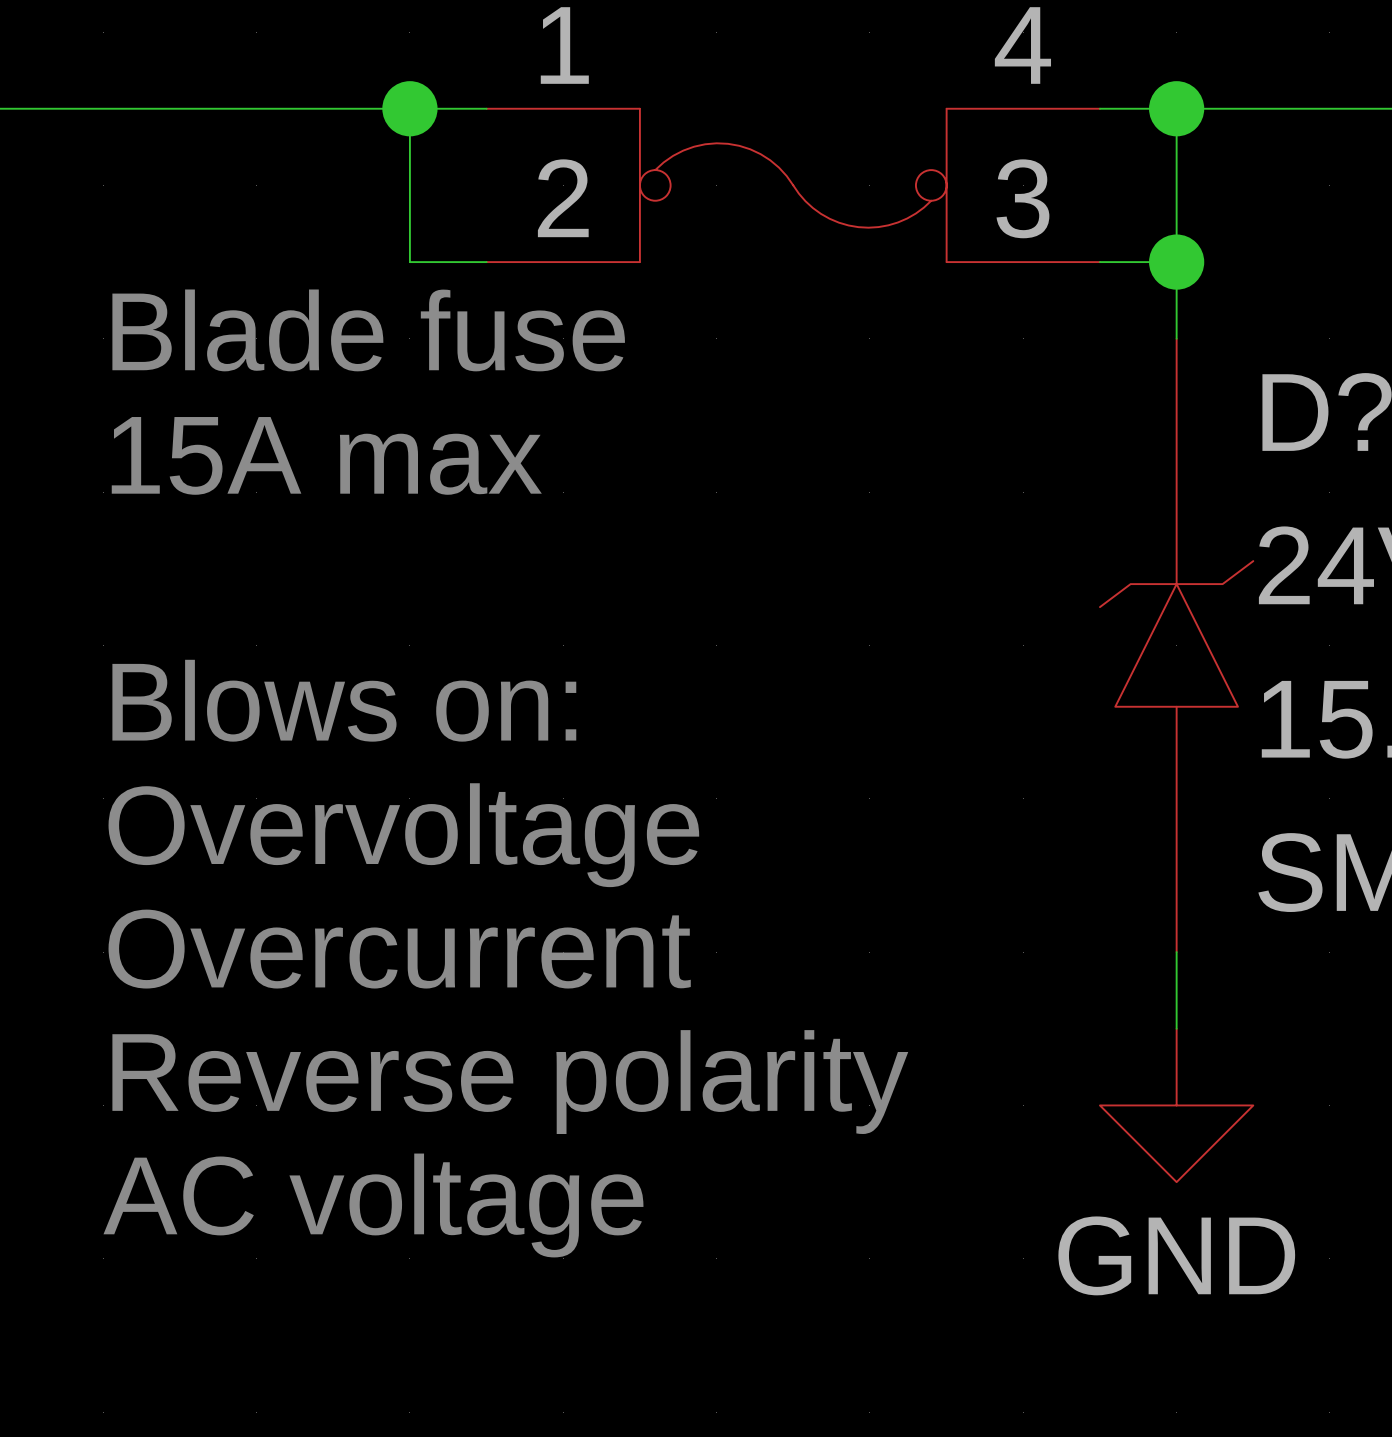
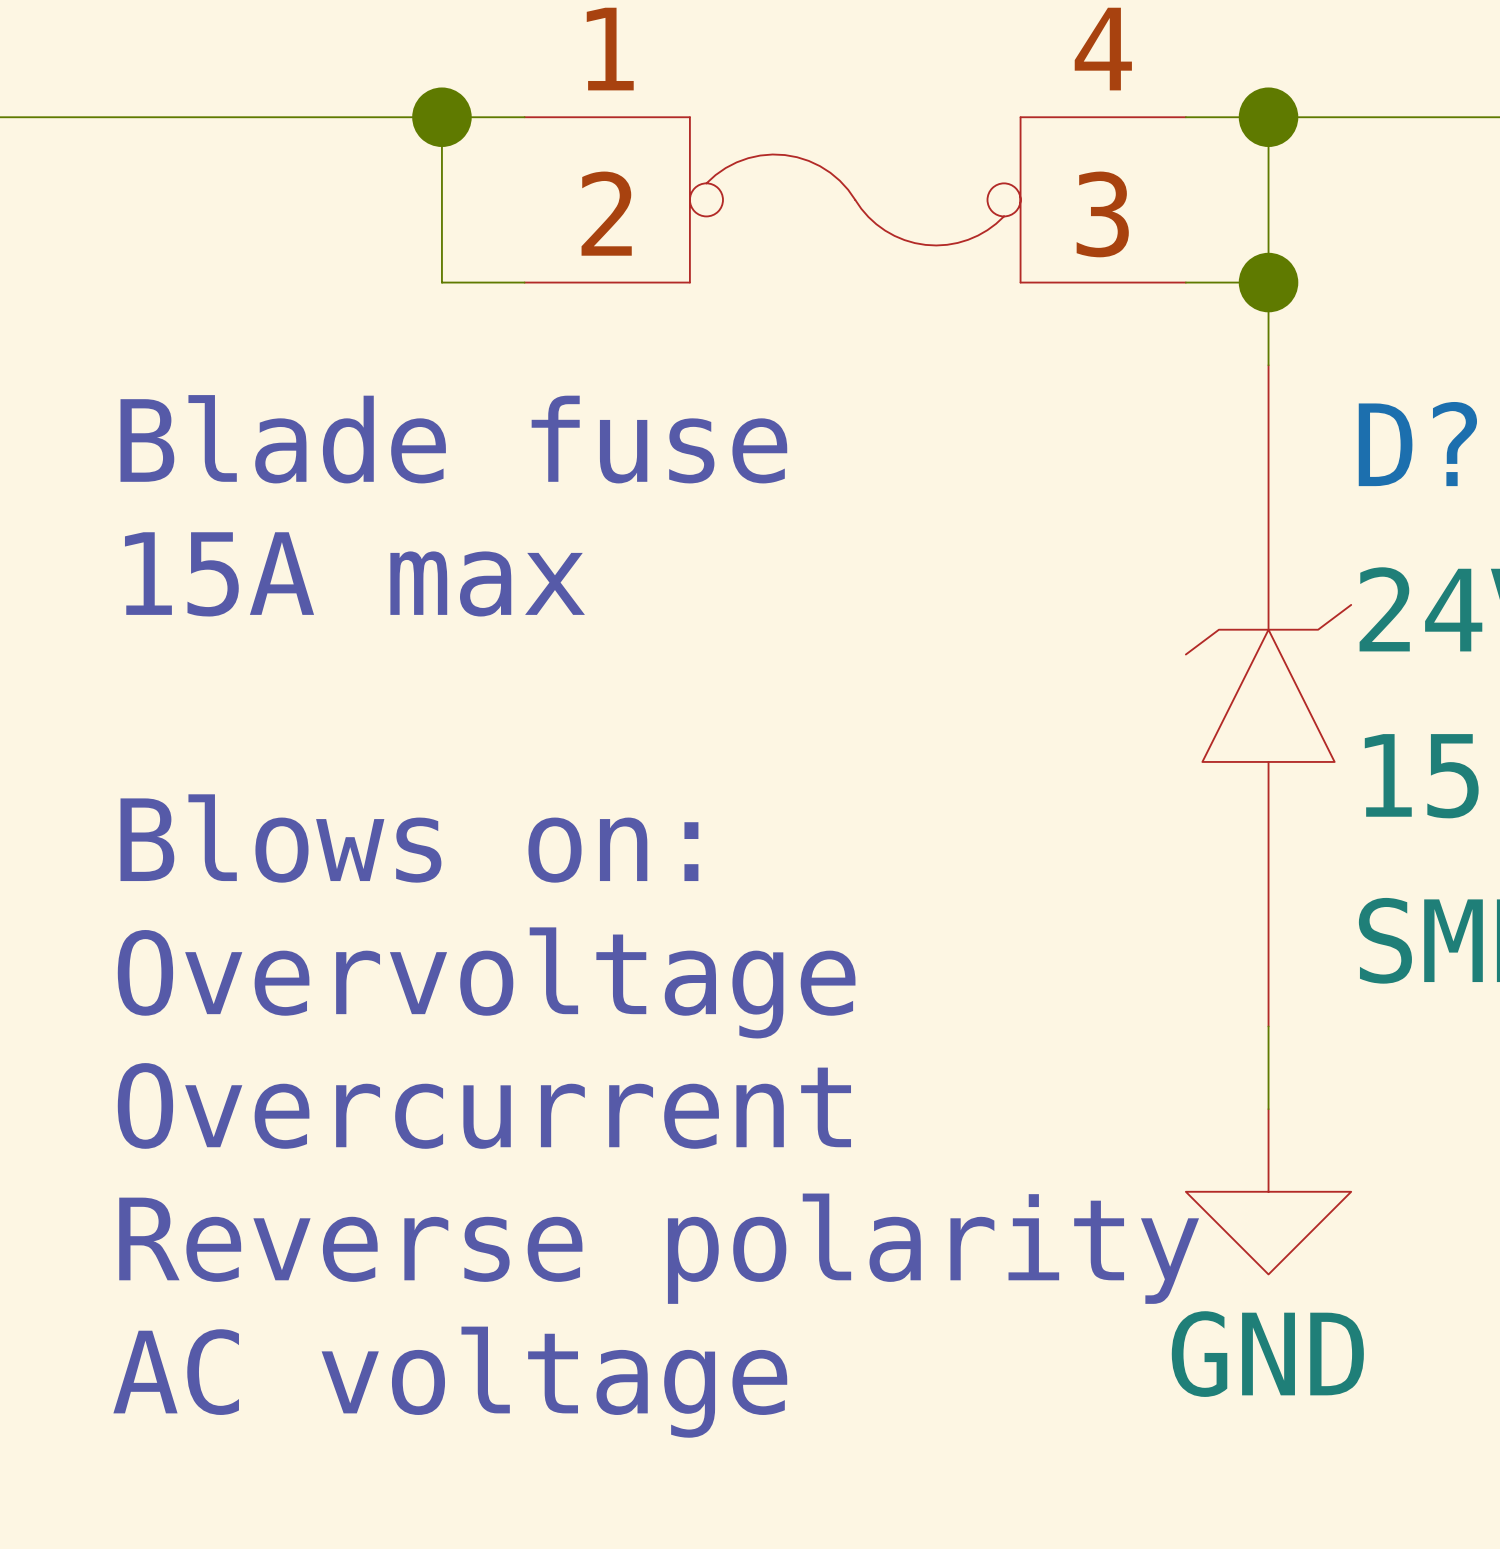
text position: Blade fuse (368, 330) -> Blade fuse (453, 439)
text position: 15A max (326, 455) -> 15A max (354, 574)
text position: Blows on: (344, 700) -> Blows on: (409, 838)
text position: Overvoltage (403, 835) -> Overvoltage (486, 982)
text position: Overcurrent (399, 949) -> Overcurrent (484, 1105)
text position: Reverse polarity (510, 1082) -> Reverse polarity (659, 1248)
text position: AC voltage (373, 1205) -> AC voltage (450, 1382)

